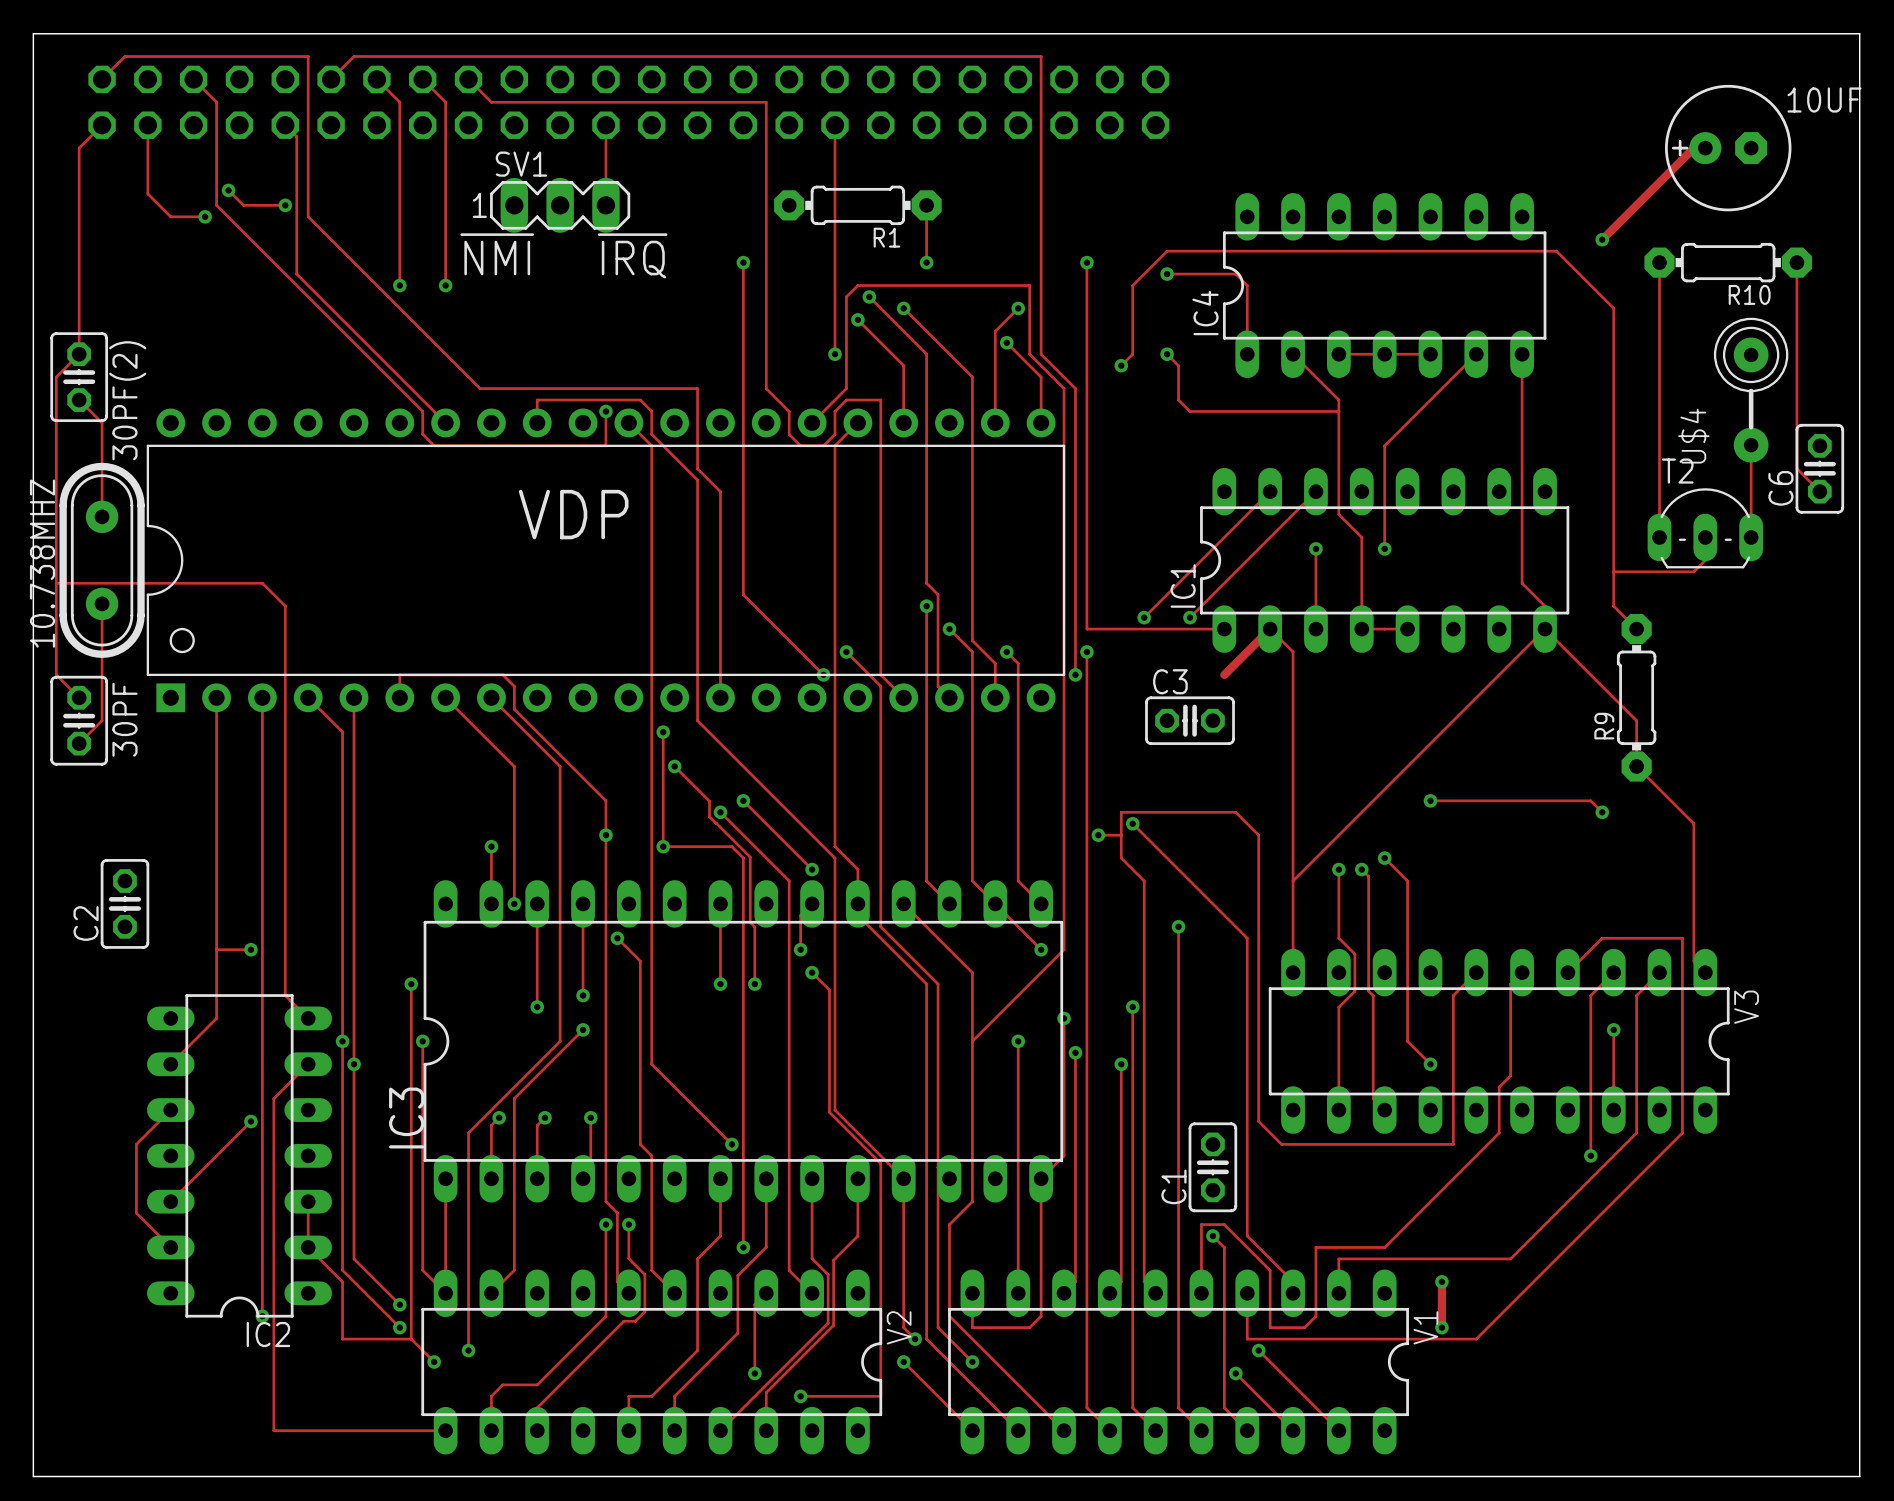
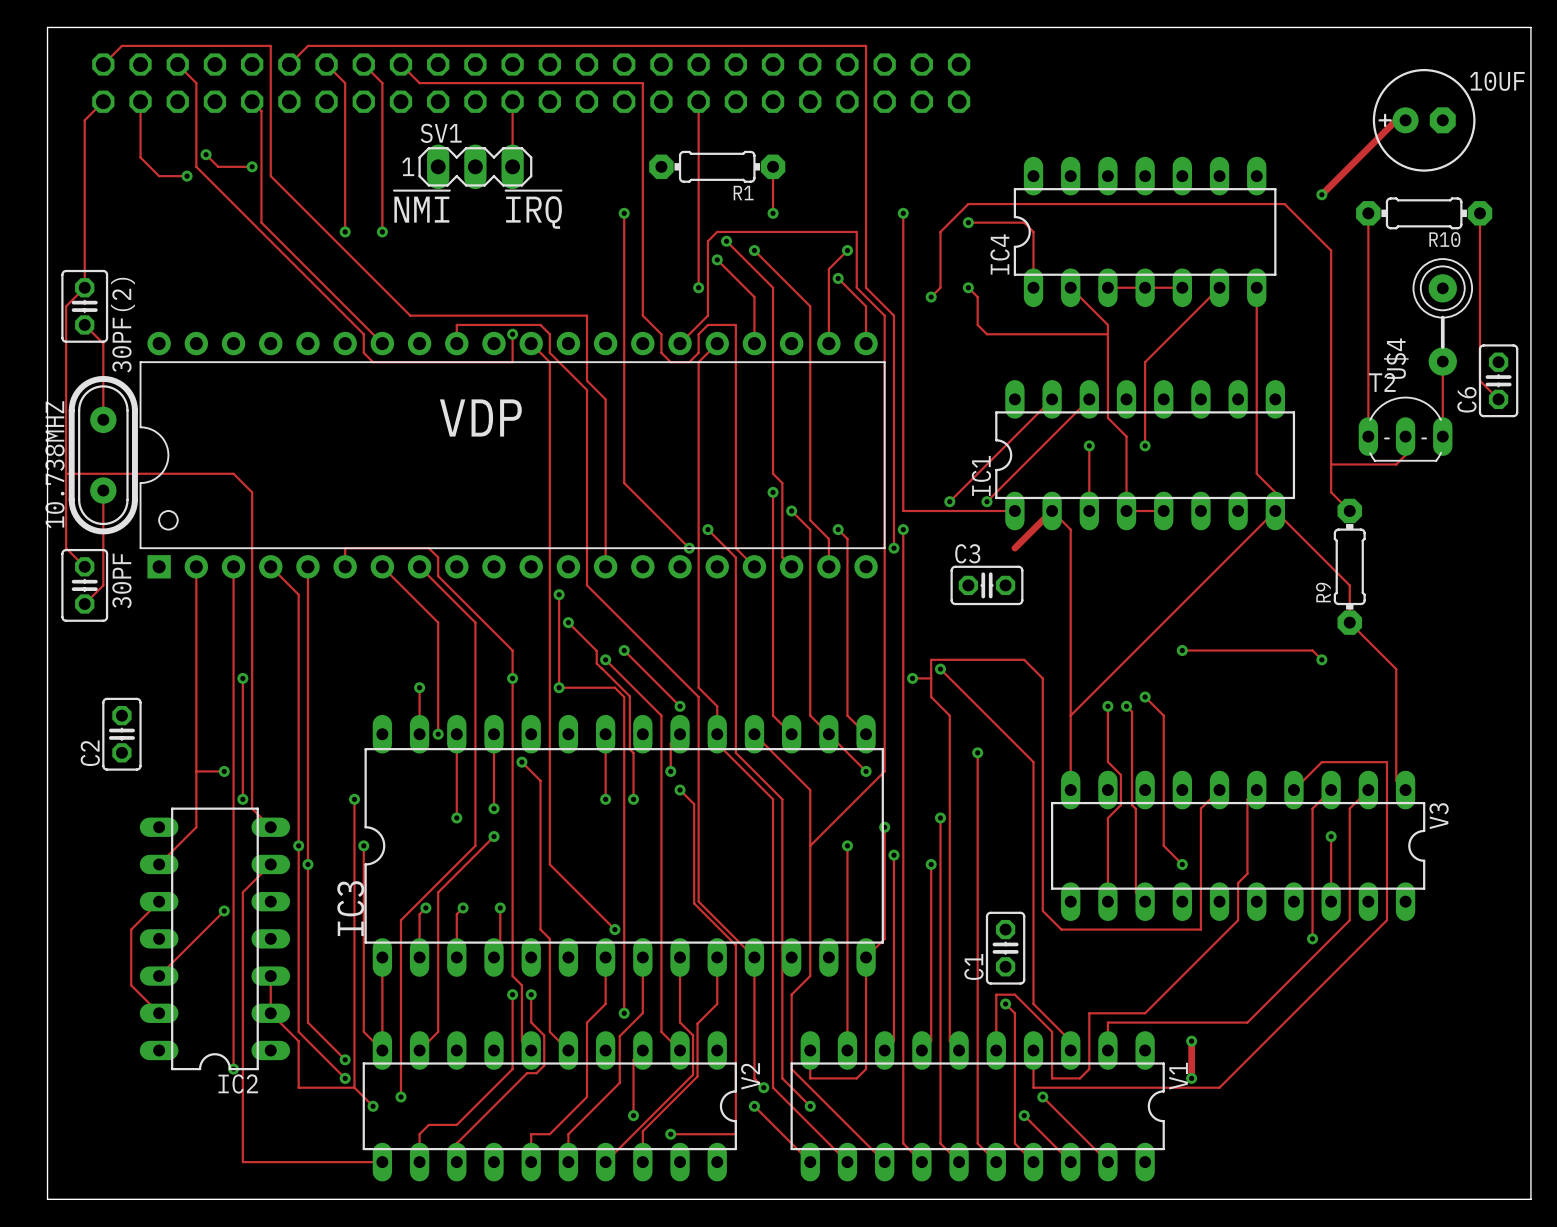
track: none -> (242, 678) (242, 799)
via: none -> (242, 678)
via: none -> (242, 799)

